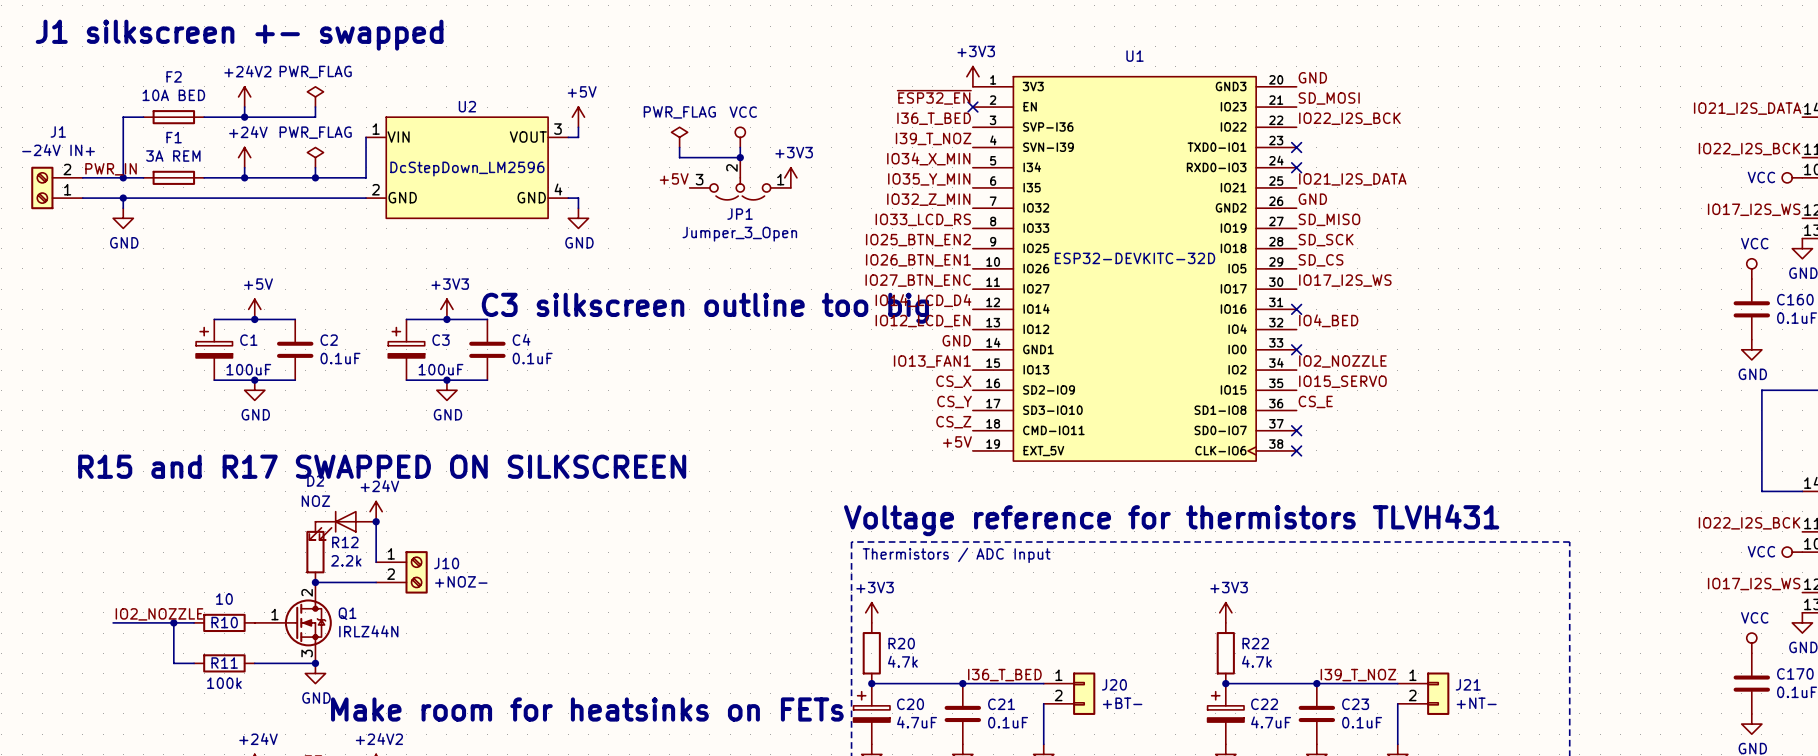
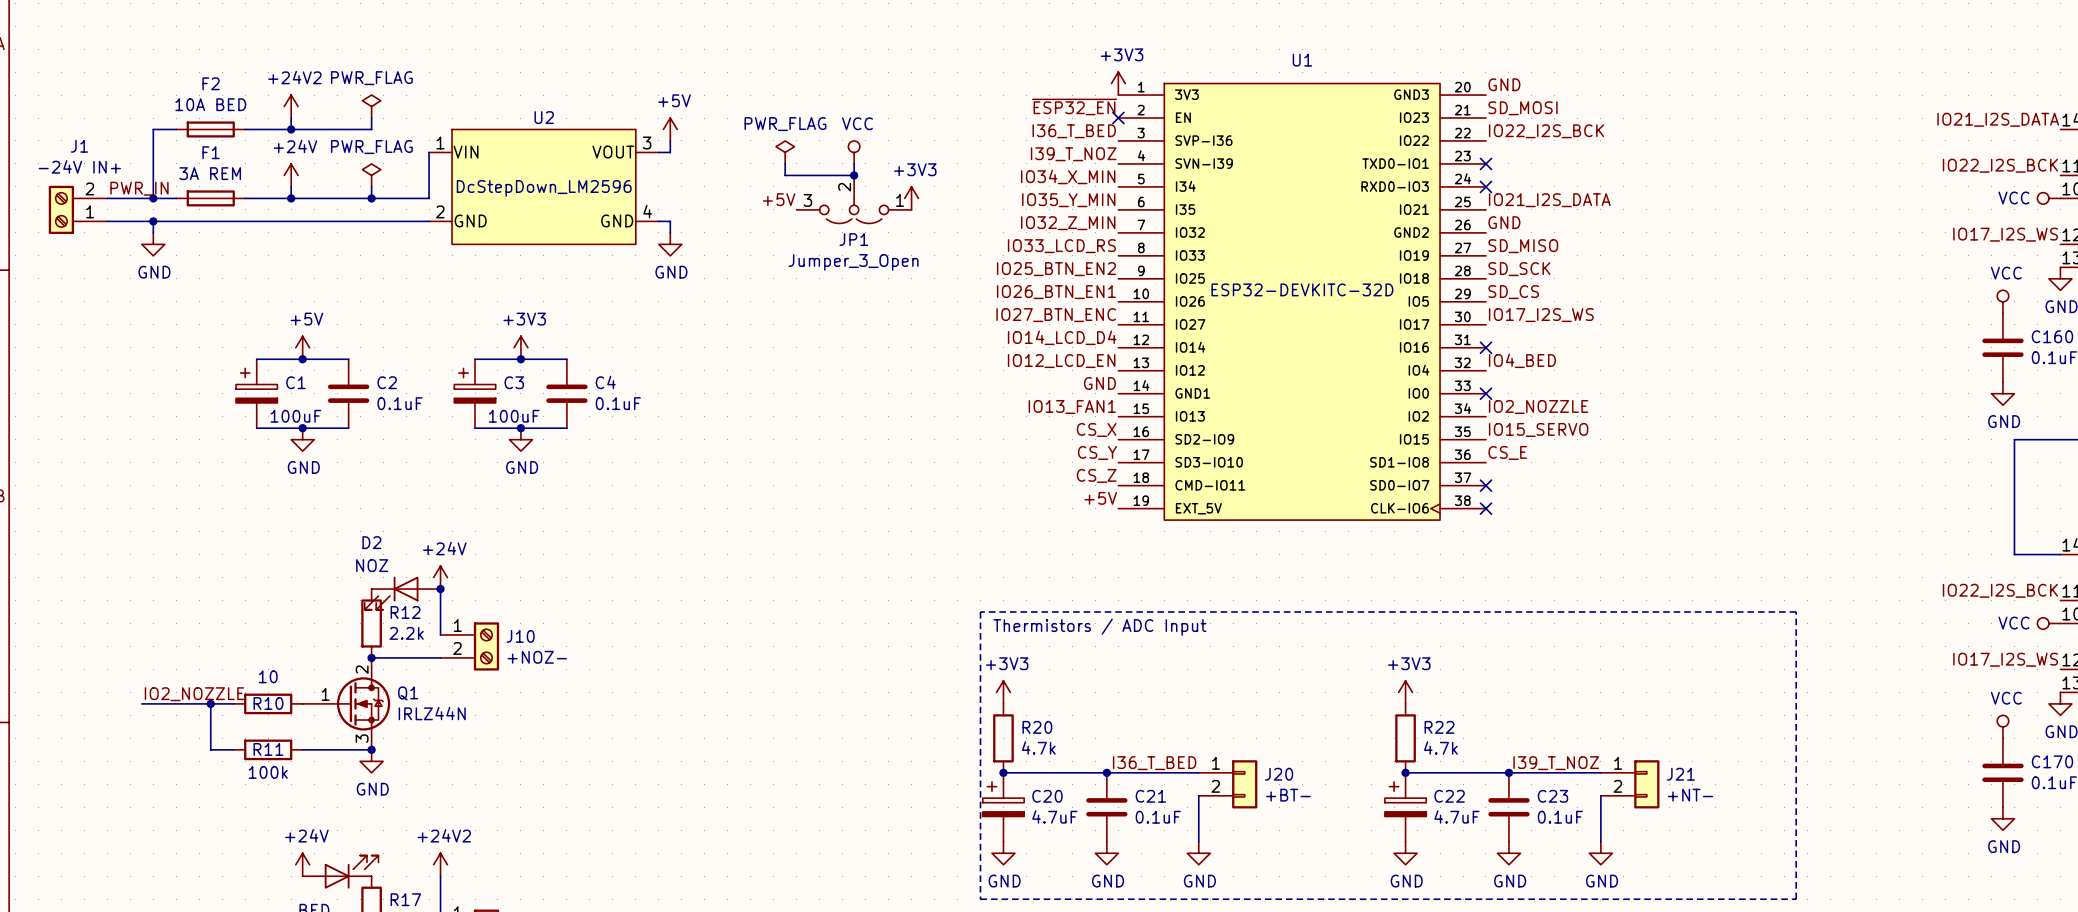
text: J1 silkscreen +- swapped (239, 35) -> none
text: C3 silkscreen outline too big (705, 308) -> none
text: R15 and R17 SWAPPED ON SILKSCREEN (382, 466) -> none
text: Voltage reference for thermistors TLVH431 (1171, 520) -> none
text: Make room for heatsinks on FETs (587, 709) -> none

